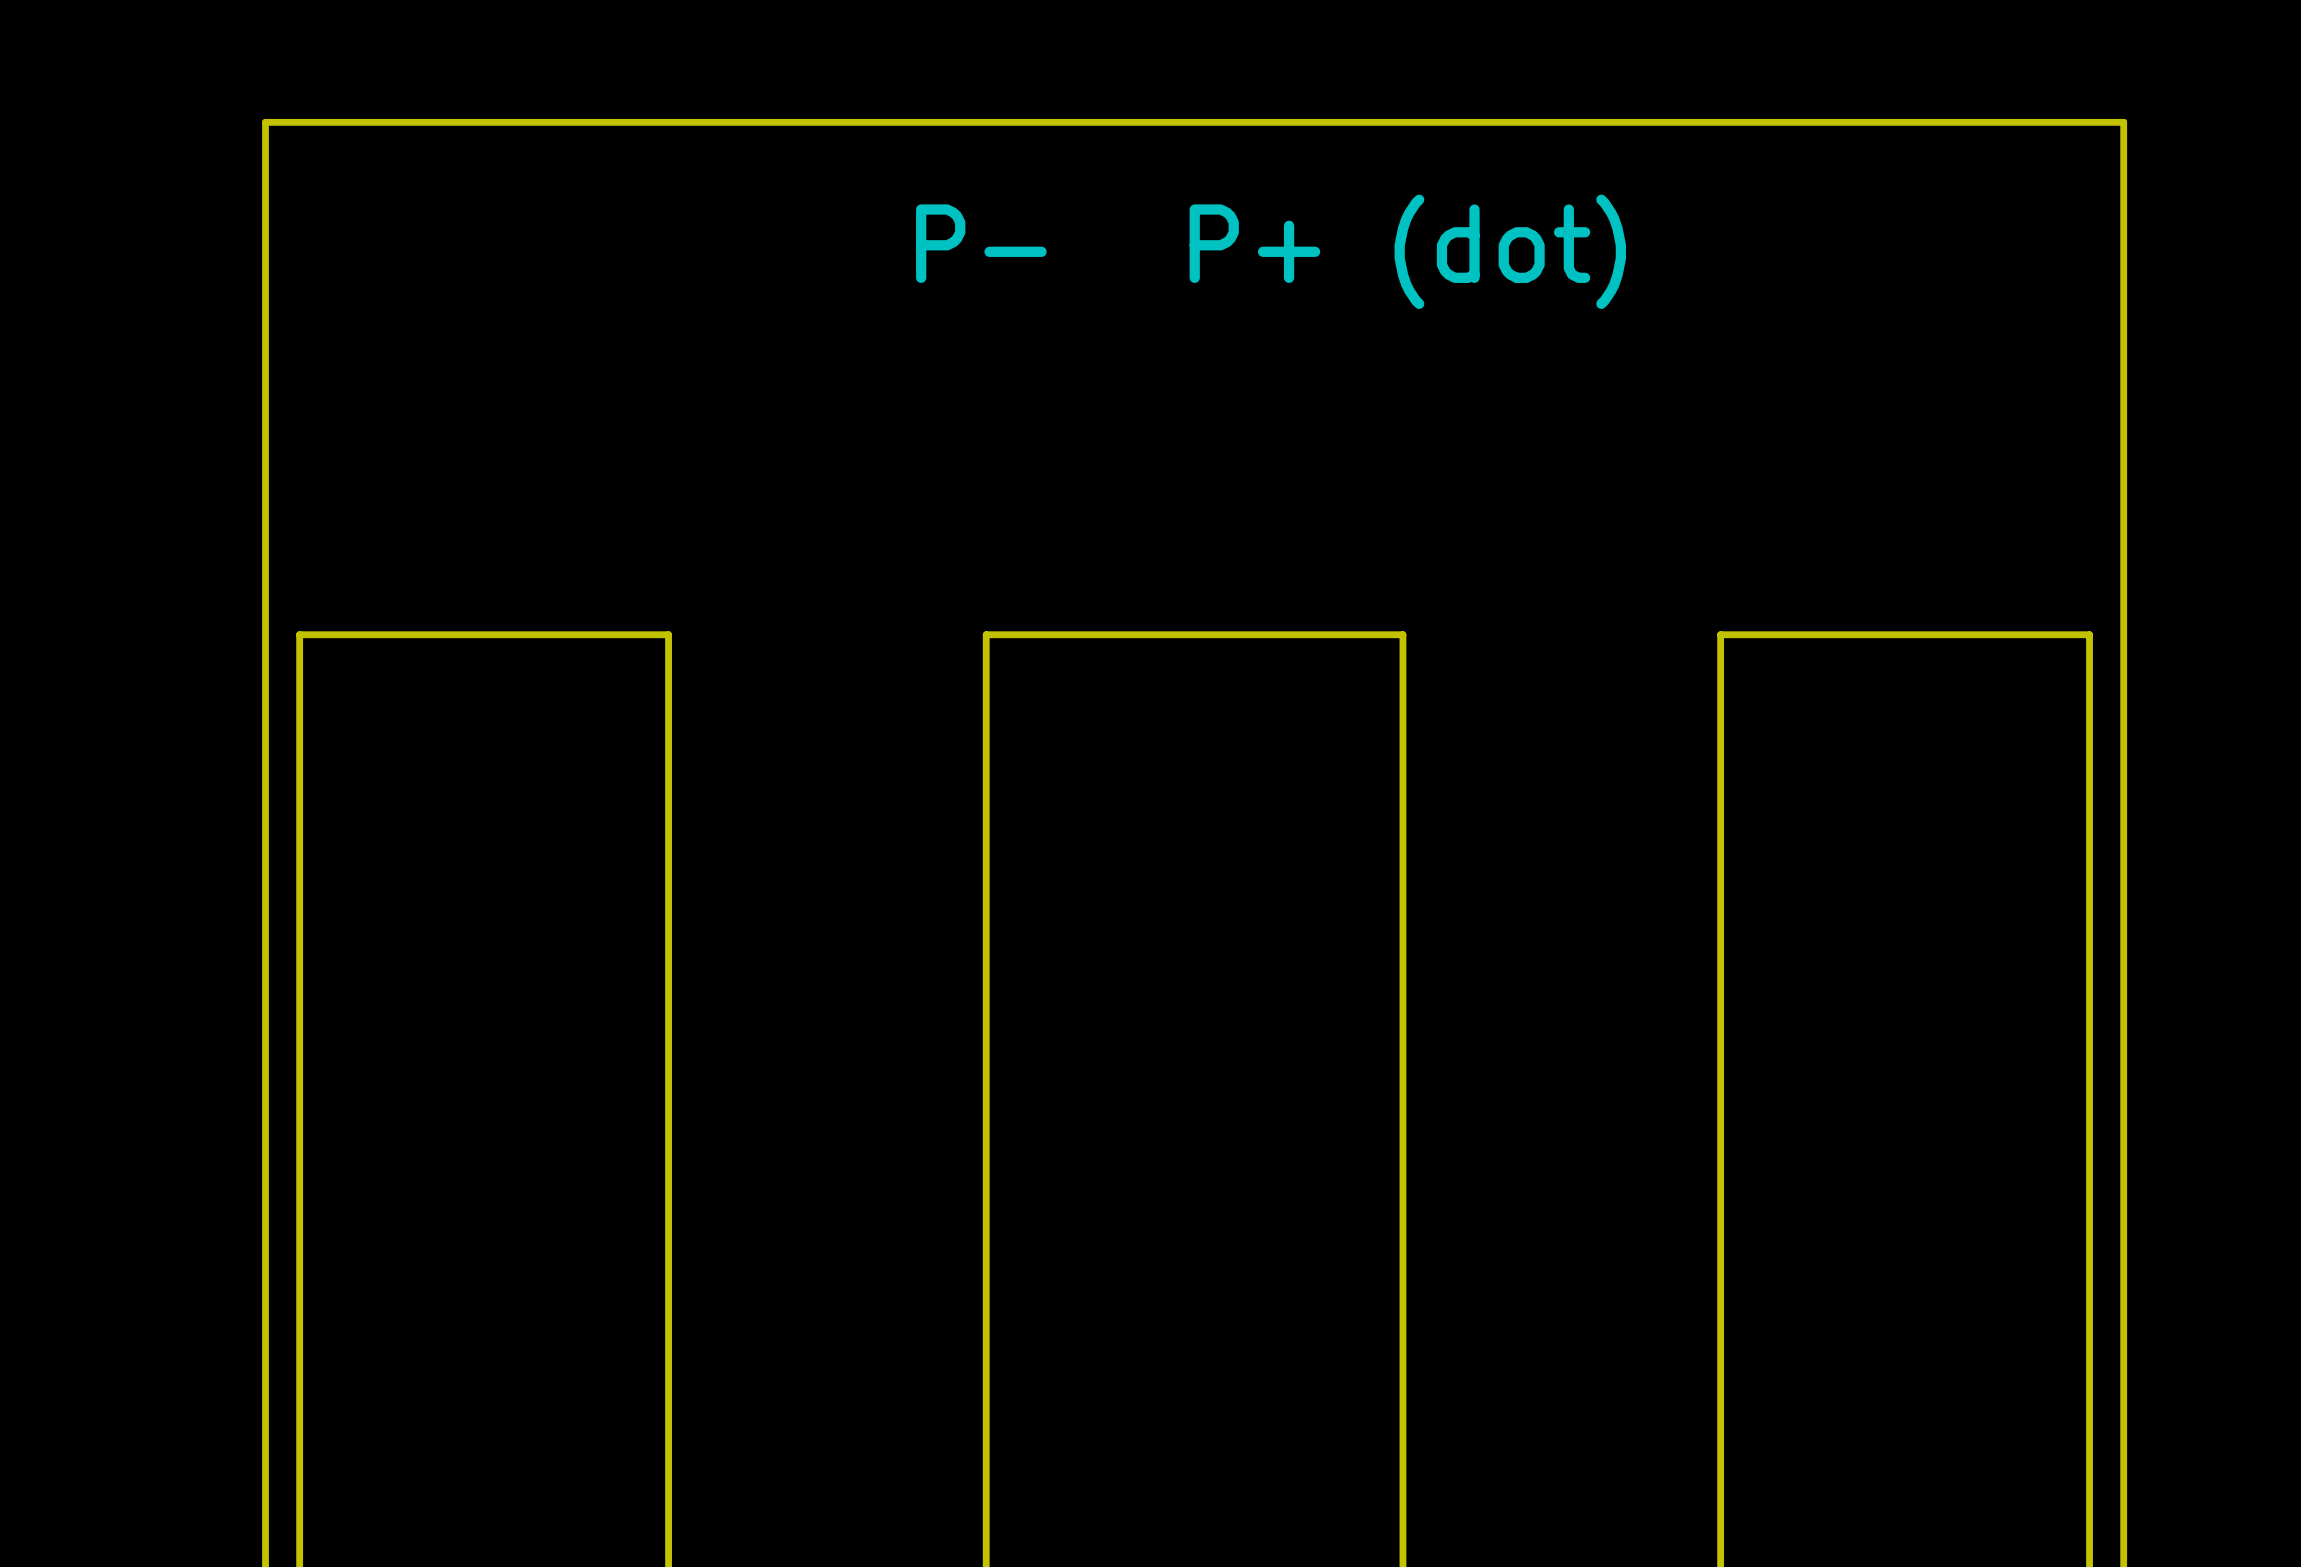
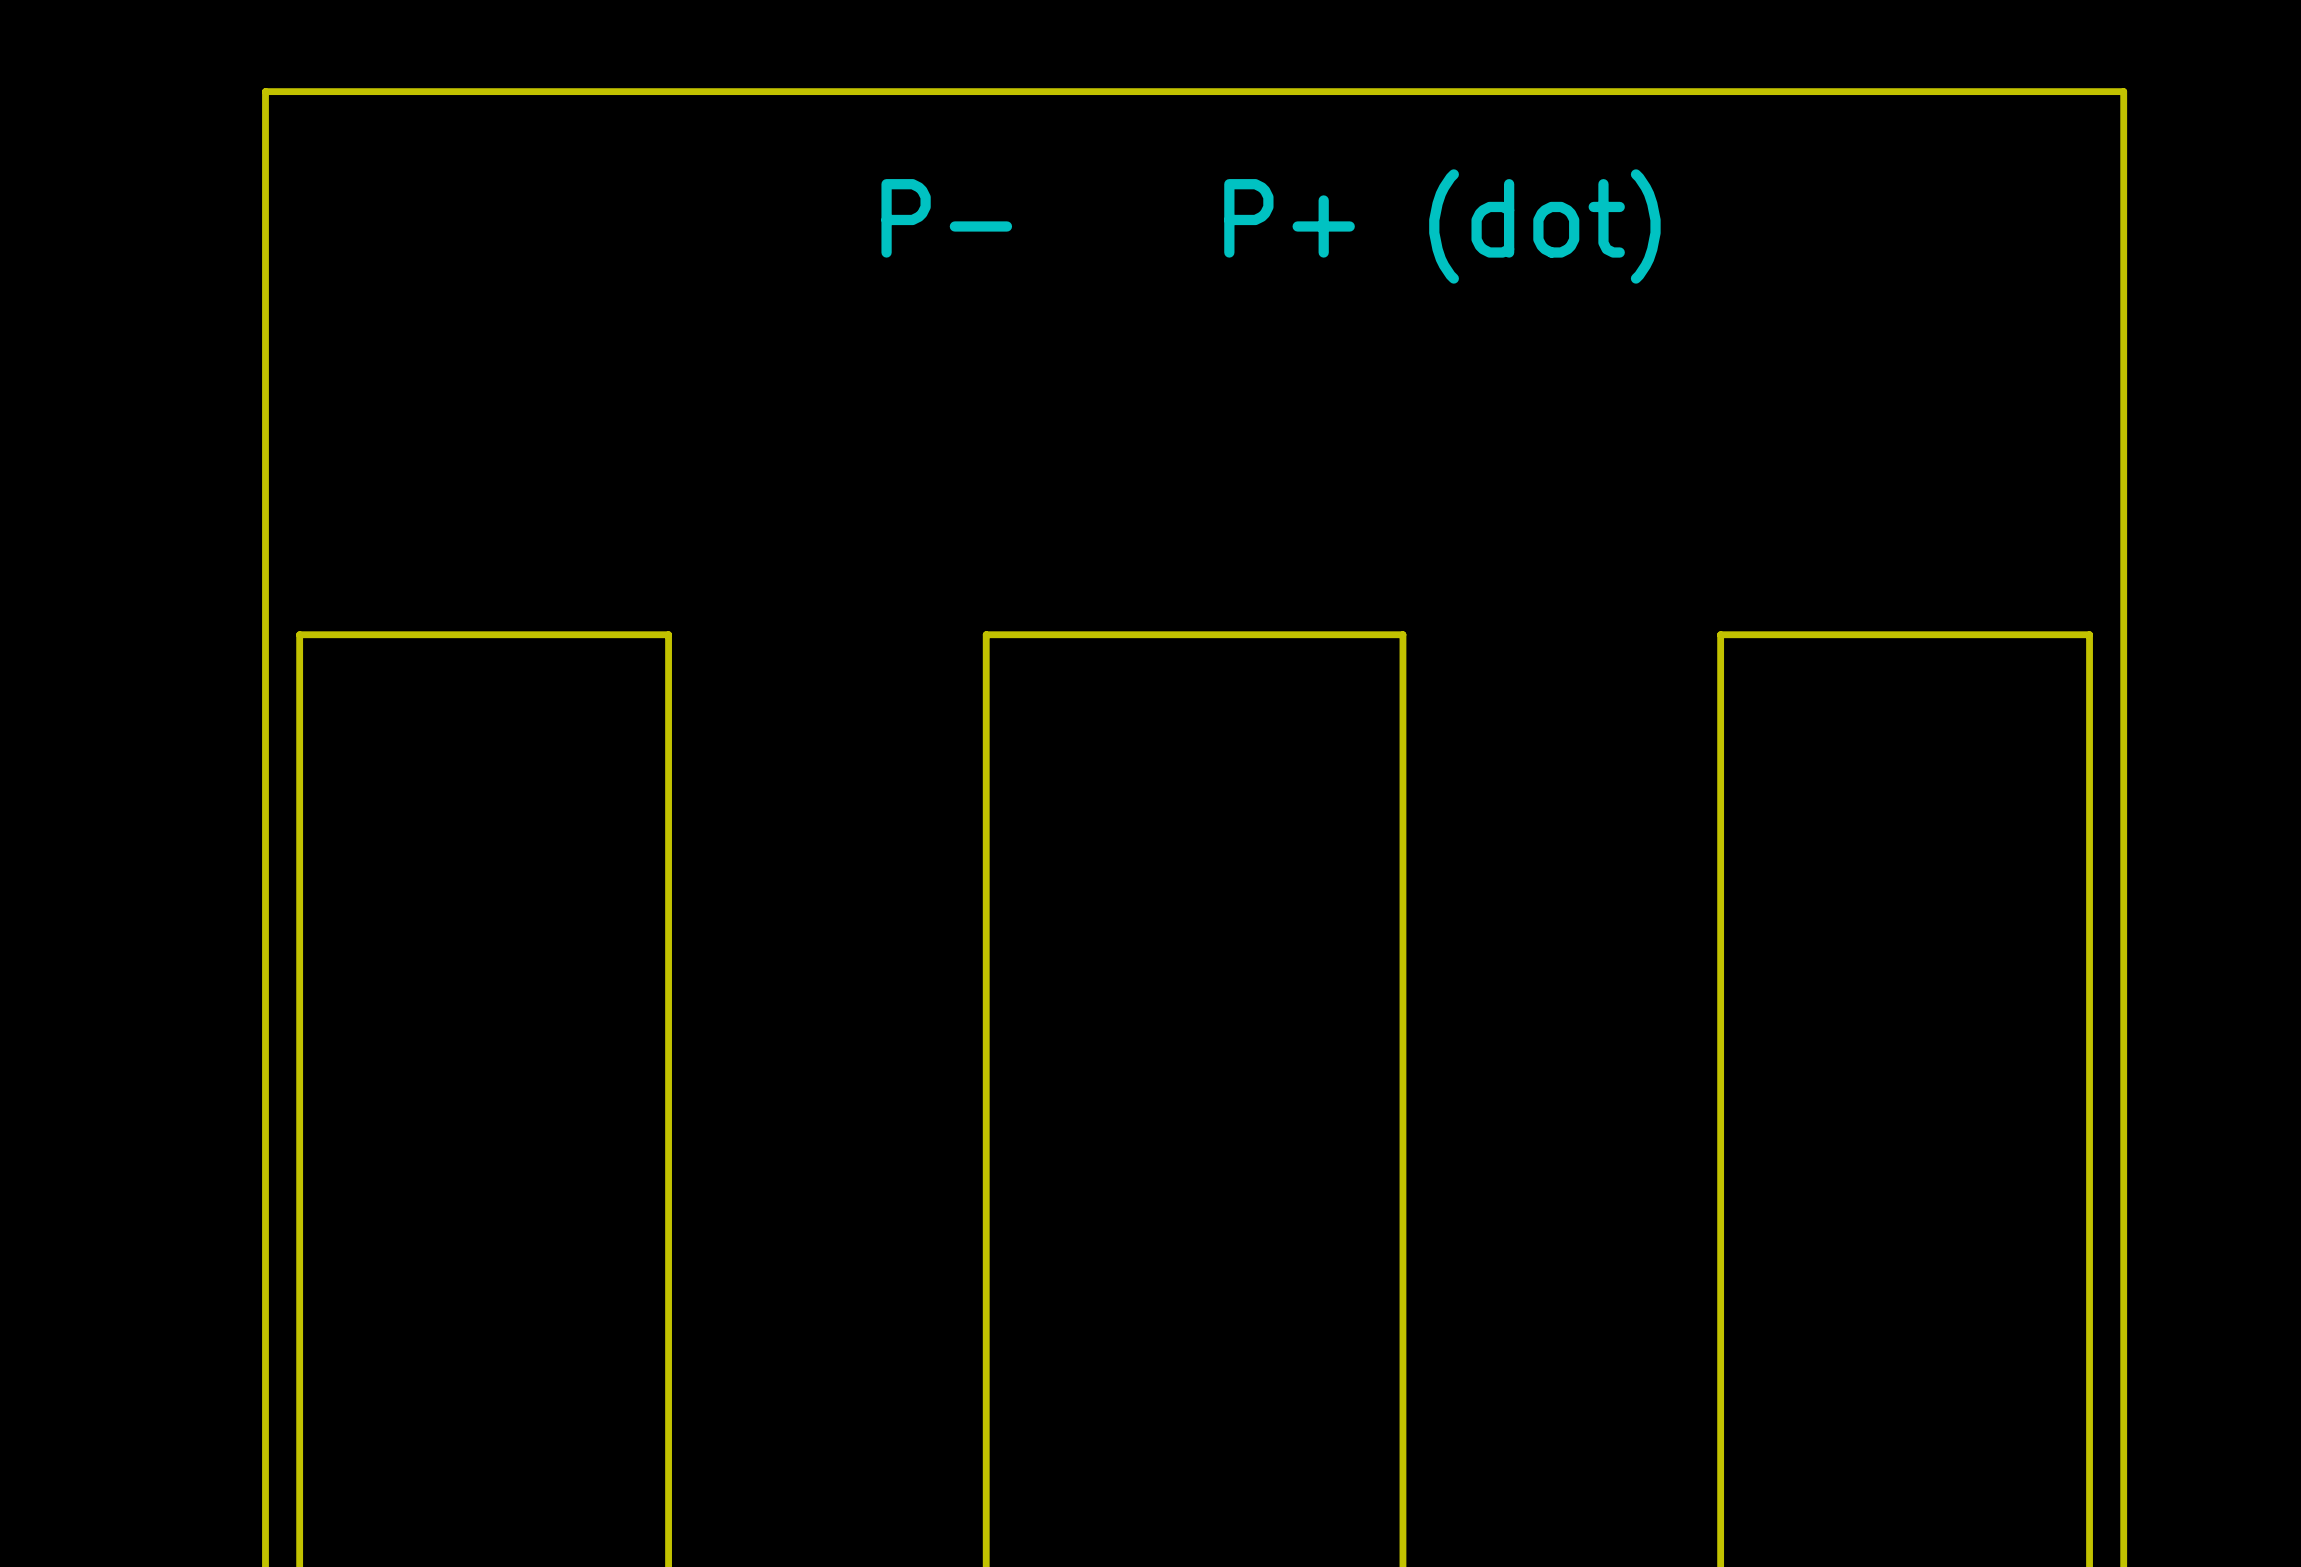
board edge: (265, 122) (2123, 122) -> (265, 122) (265, 91) (2123, 91) (2123, 122)
text position: P− (981, 243) -> P− (946, 218)
text position: P+ (dot) (1407, 251) -> P+ (dot) (1442, 226)

